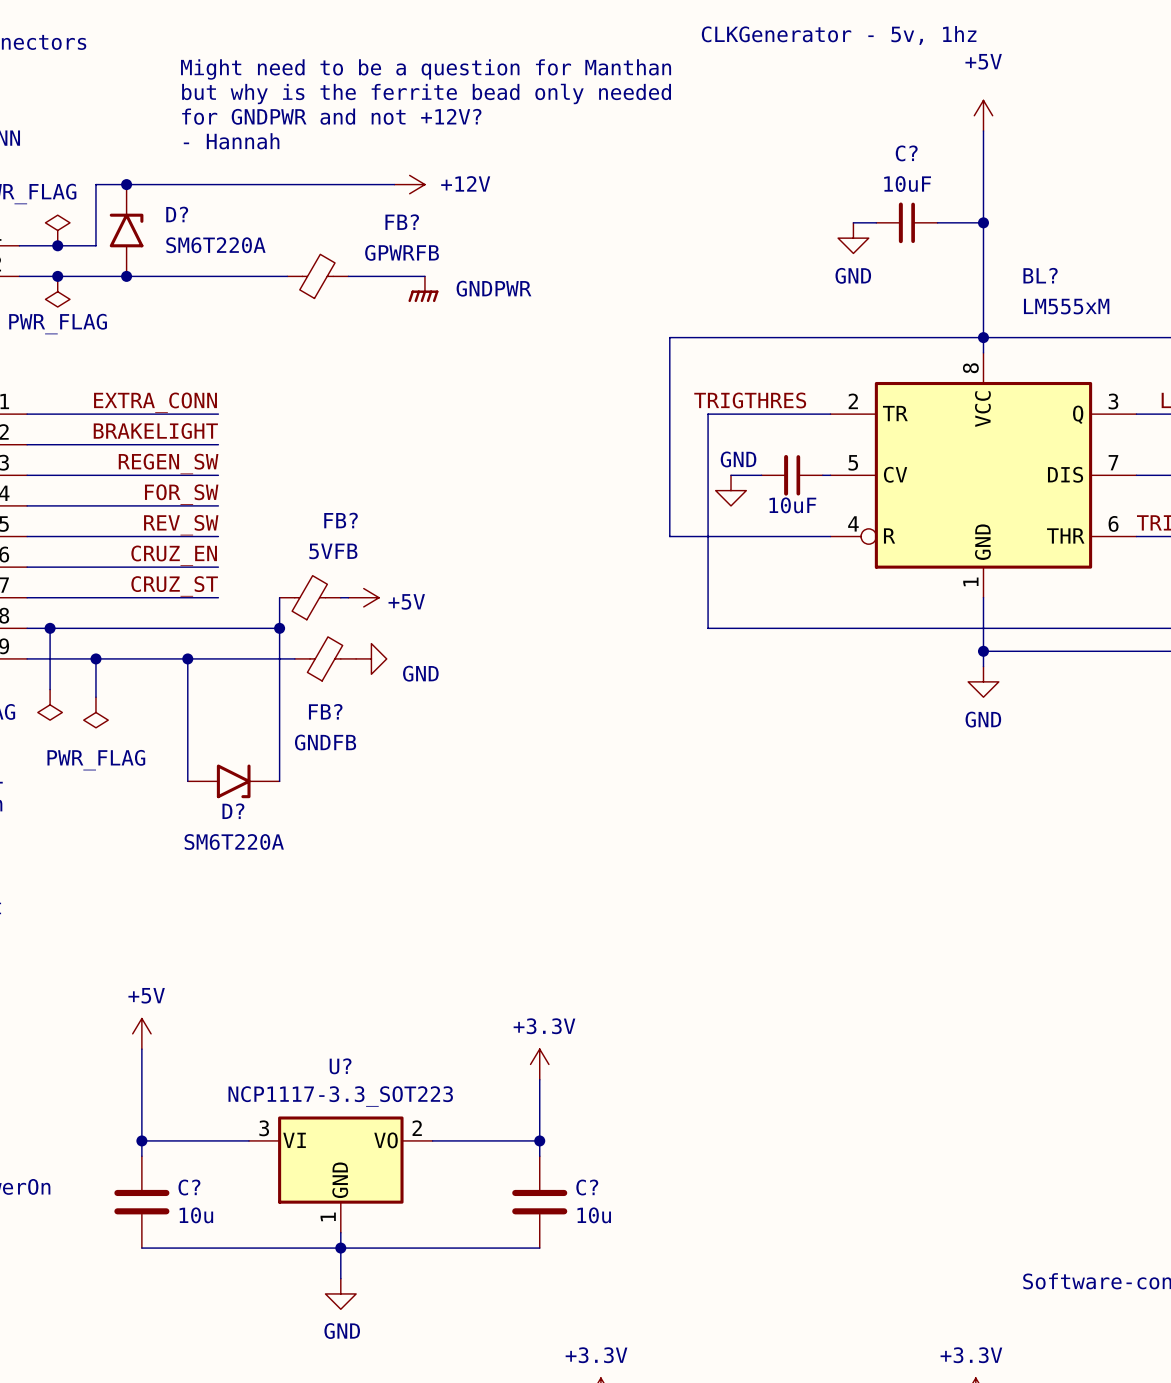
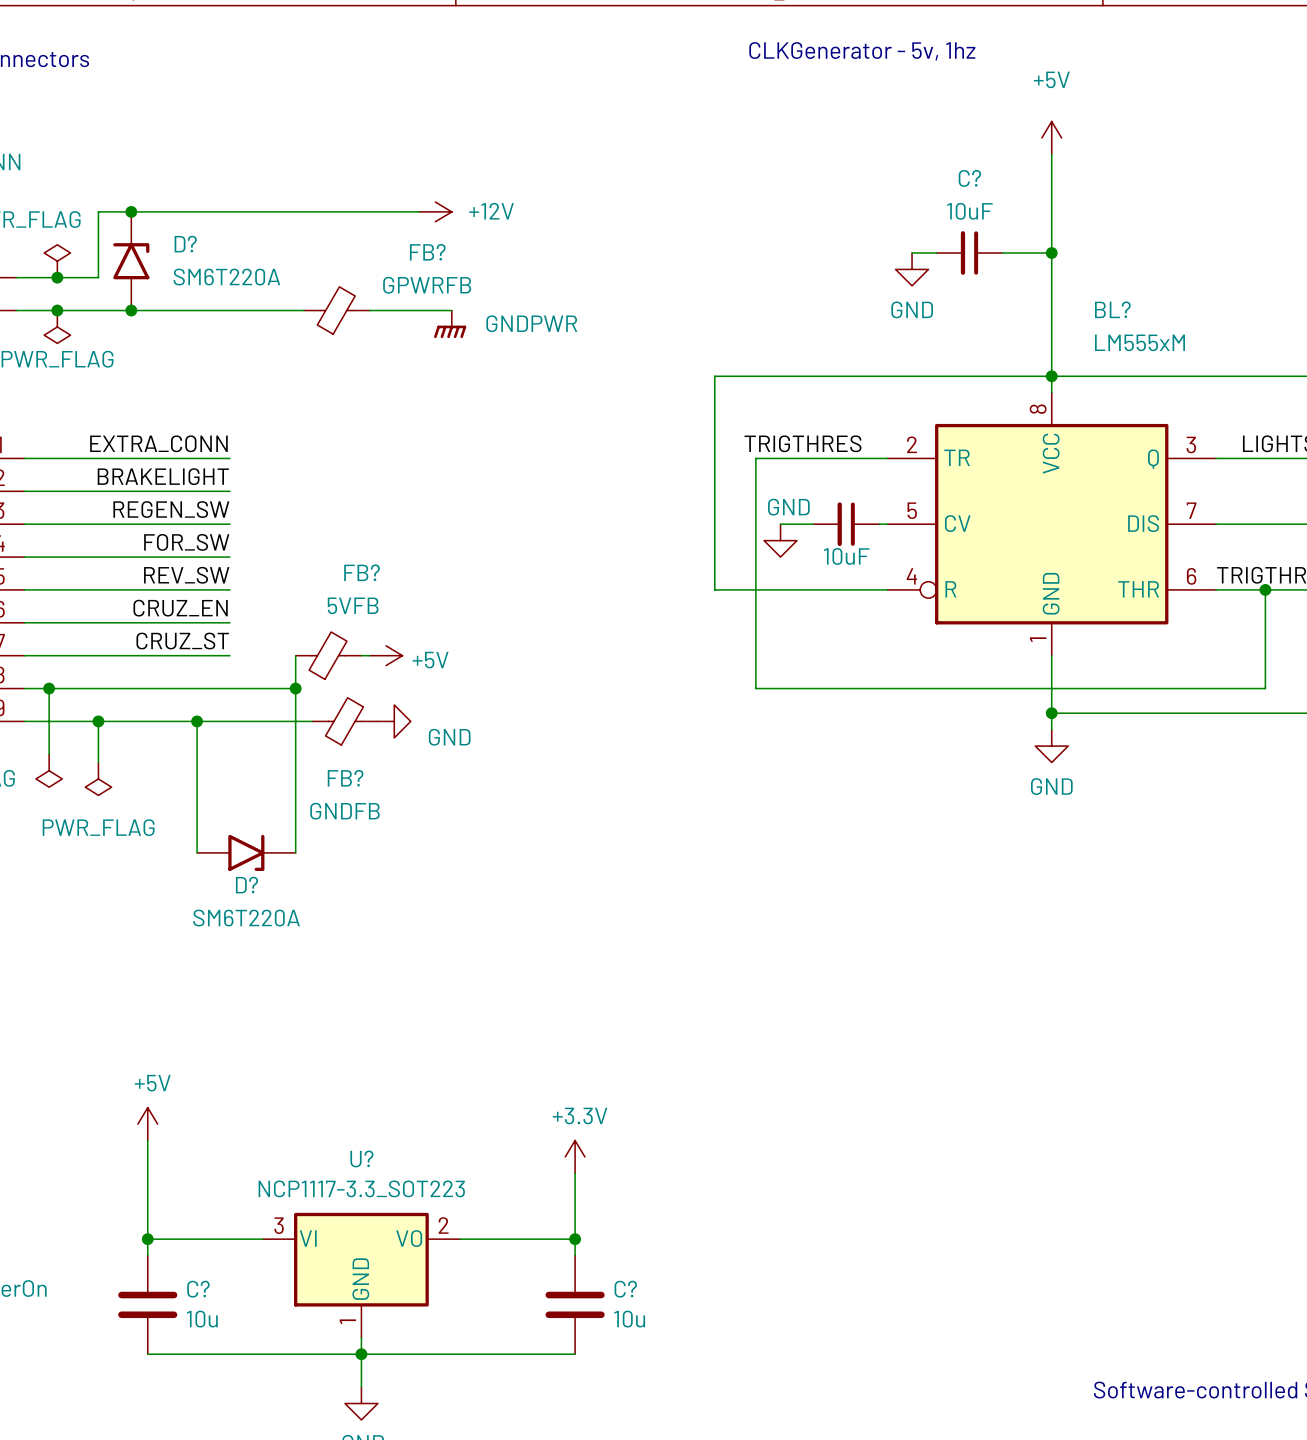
text: Might need to be a question for Manthan (426, 69) -> none
text: but why is the ferrite bead only needed (426, 93) -> none
text: for GNDPWR and not +12V? (331, 116) -> none
text: - Hannah (231, 141) -> none

